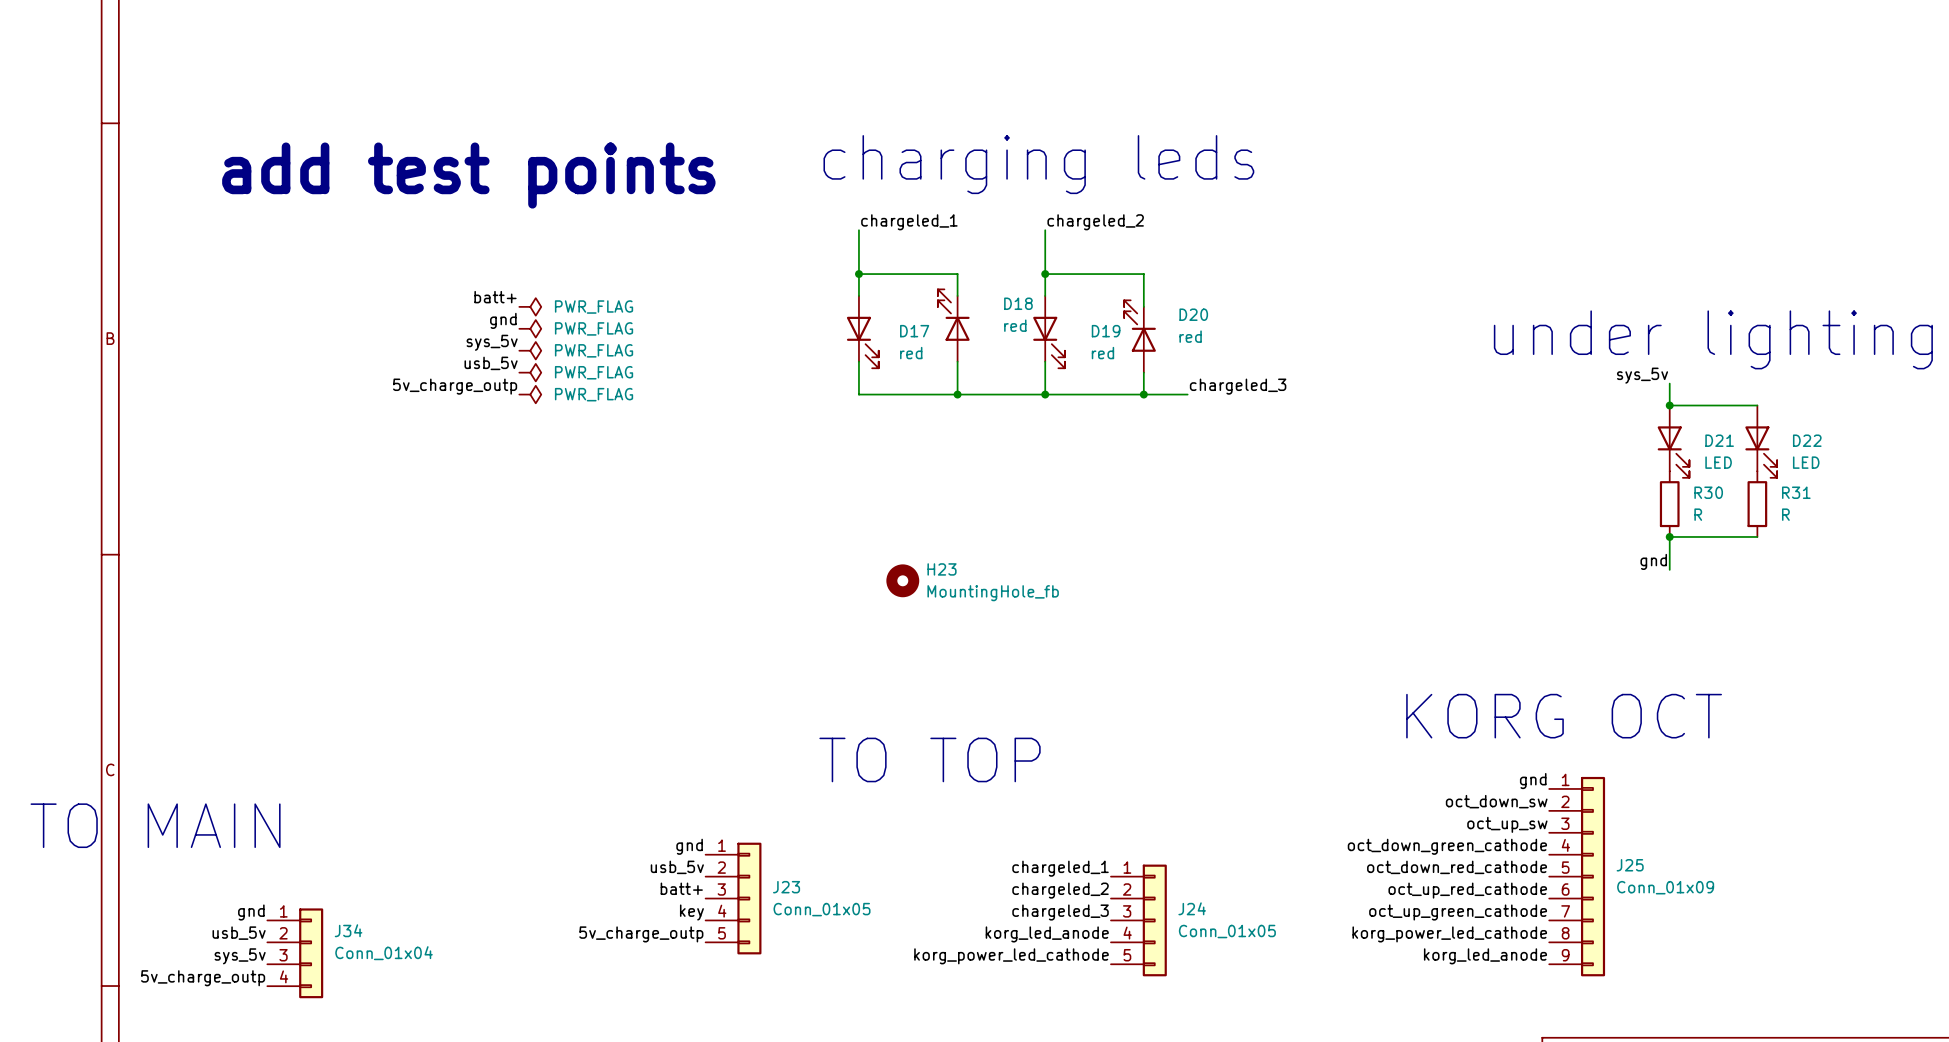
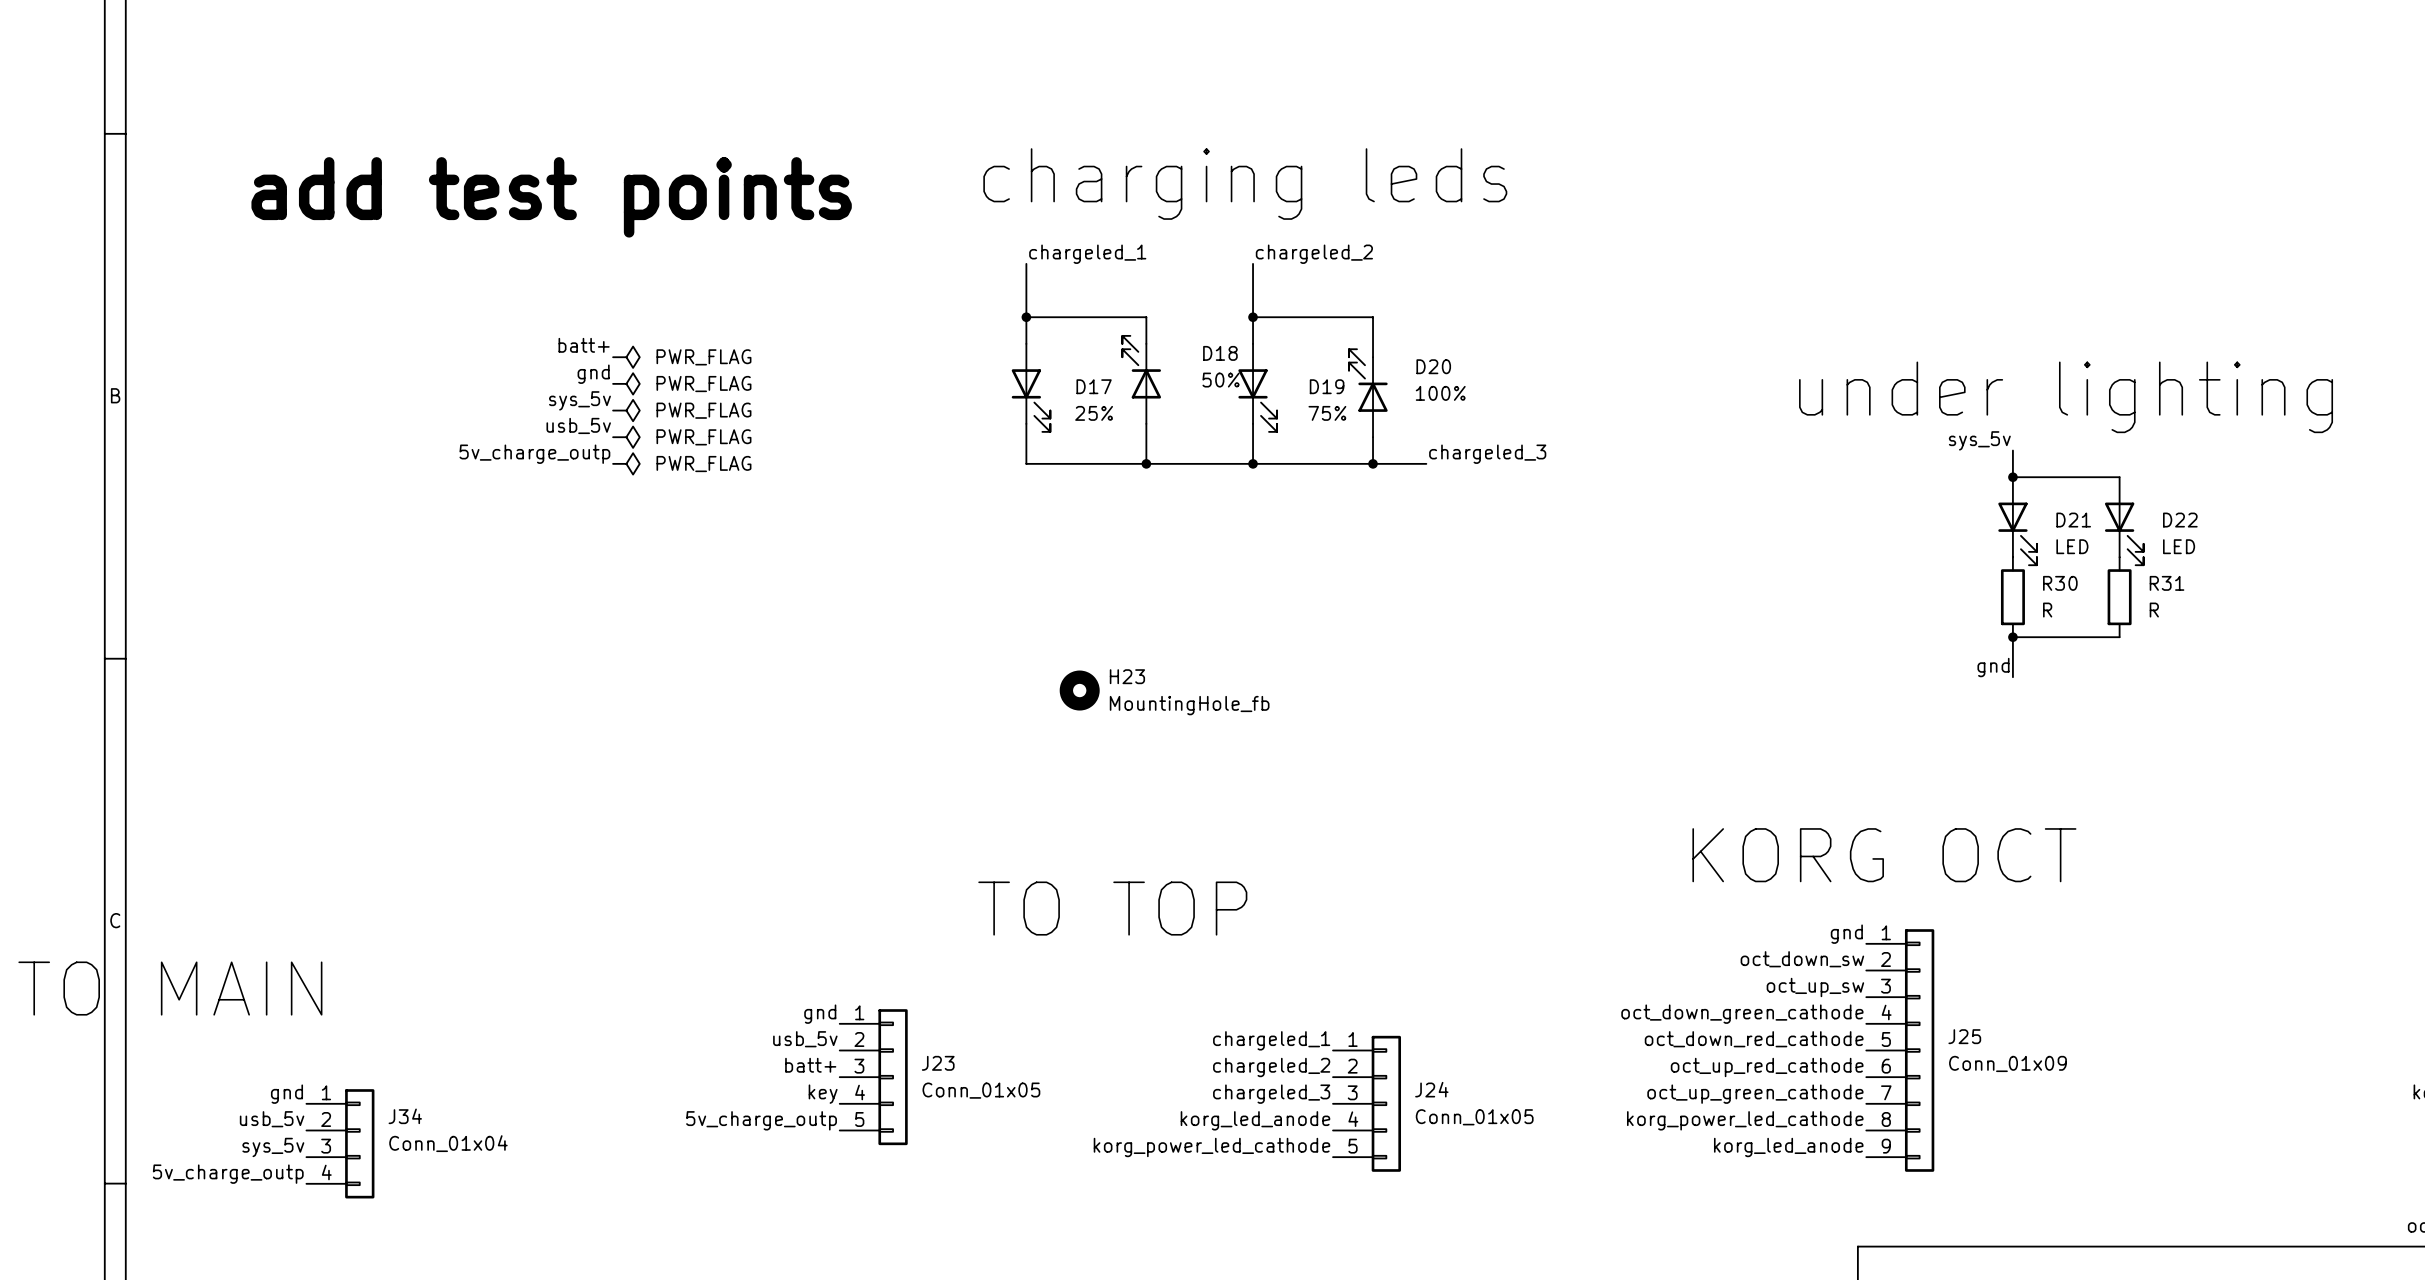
D18 value: red (1015, 325) -> 50% (1221, 380)
D20 value: red (1190, 336) -> 100% (1440, 393)
D17 value: red (911, 353) -> 25% (1094, 413)
D19 value: red (1102, 353) -> 75% (1327, 413)

